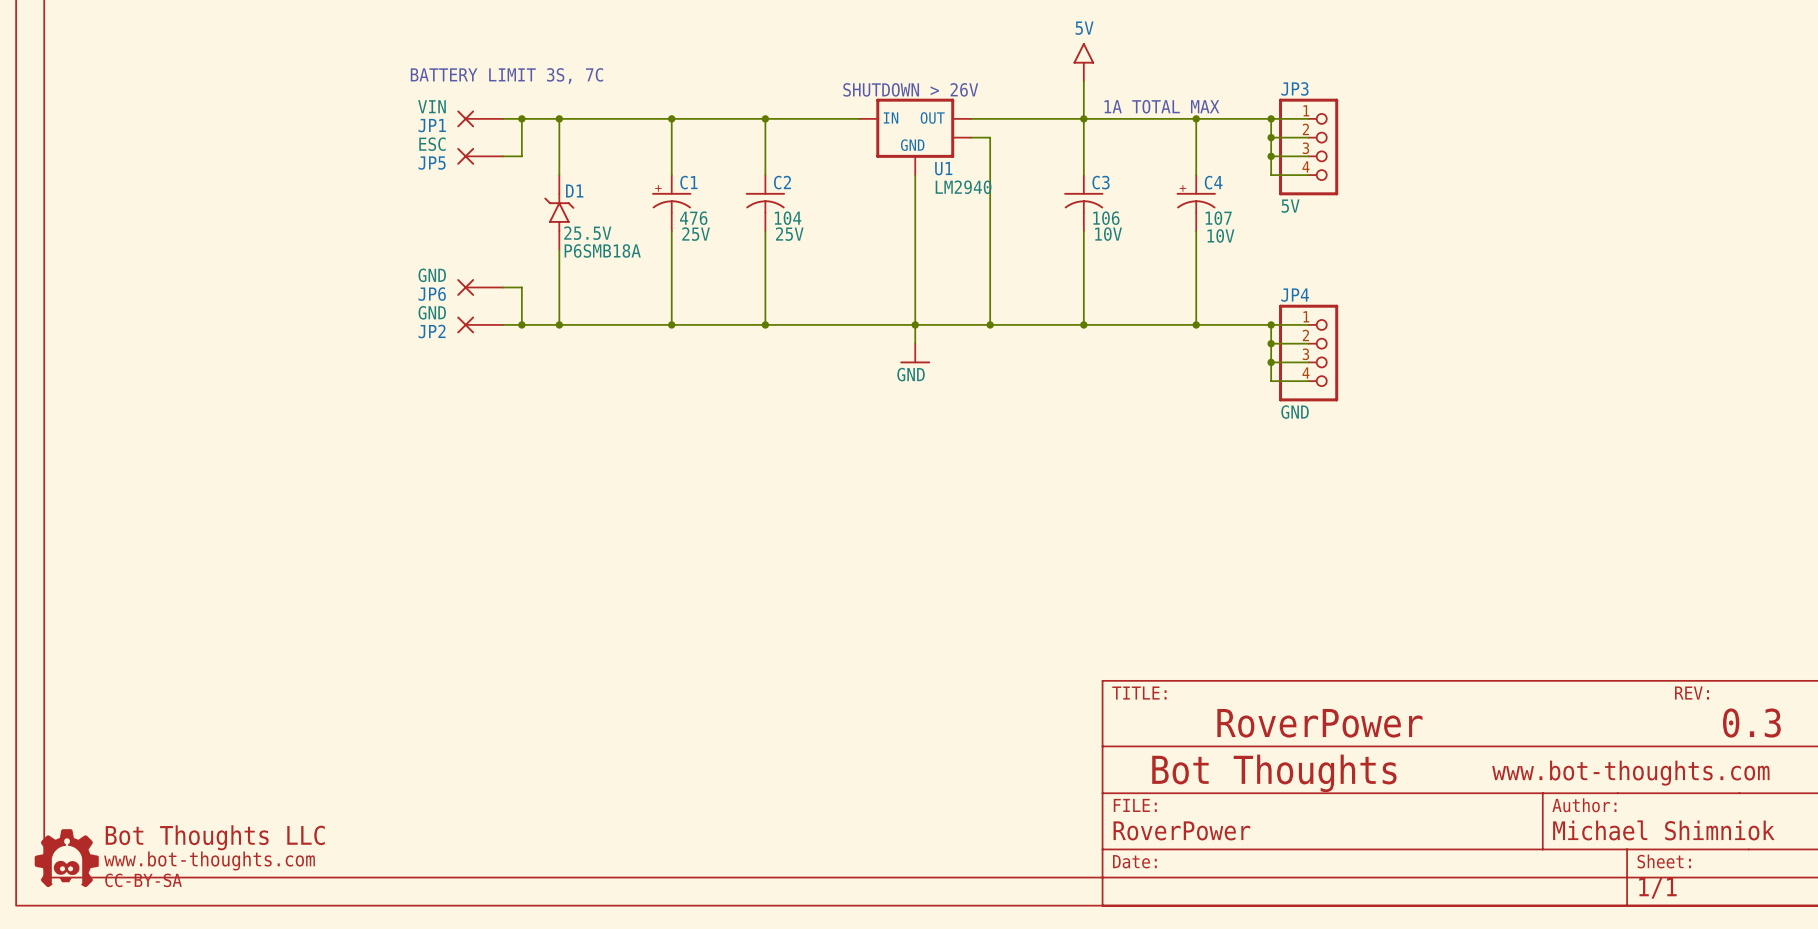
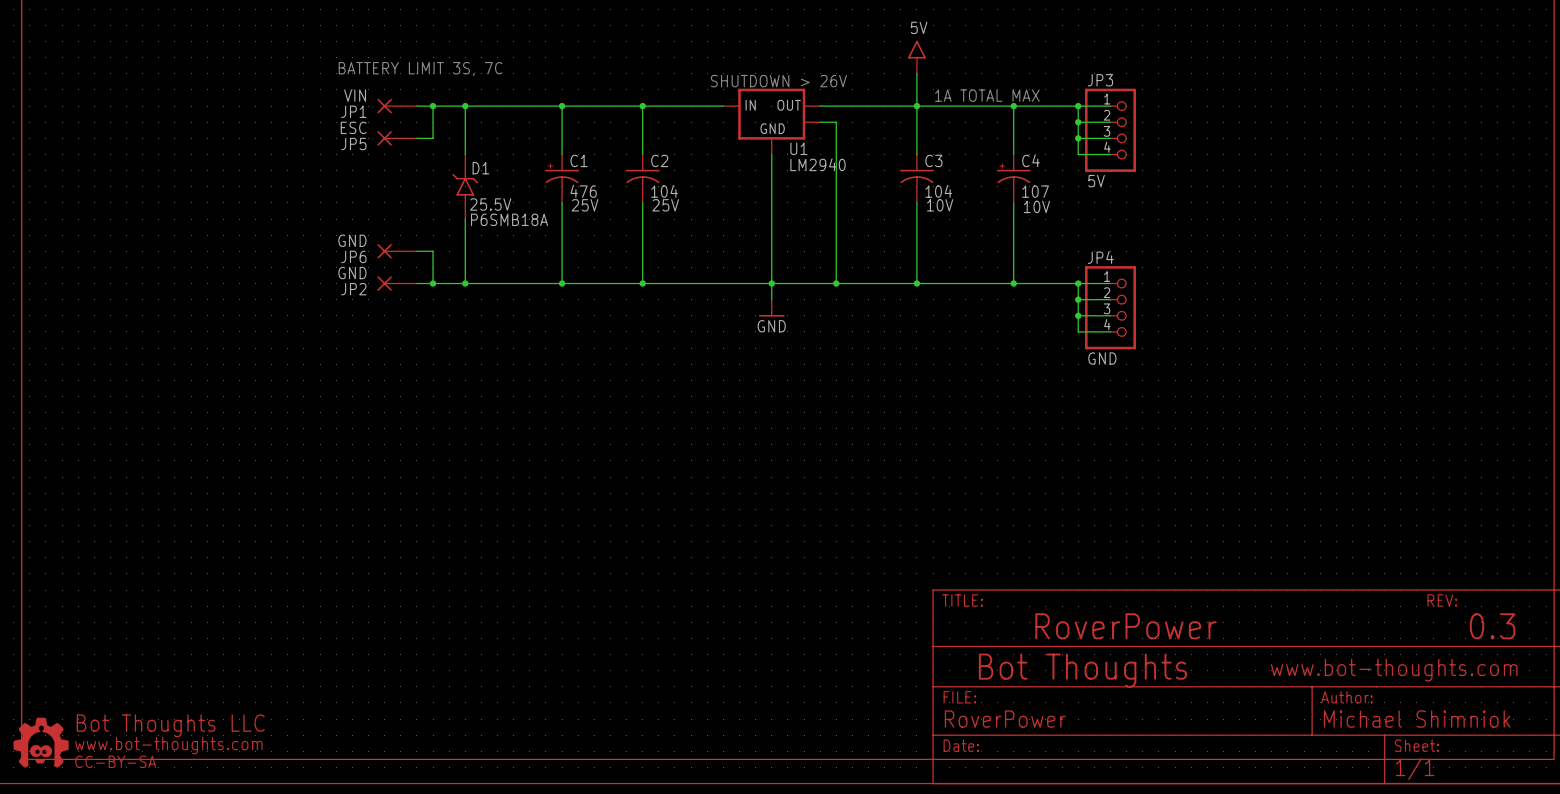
C3 value: 106 (1106, 218) -> 104 (938, 191)

